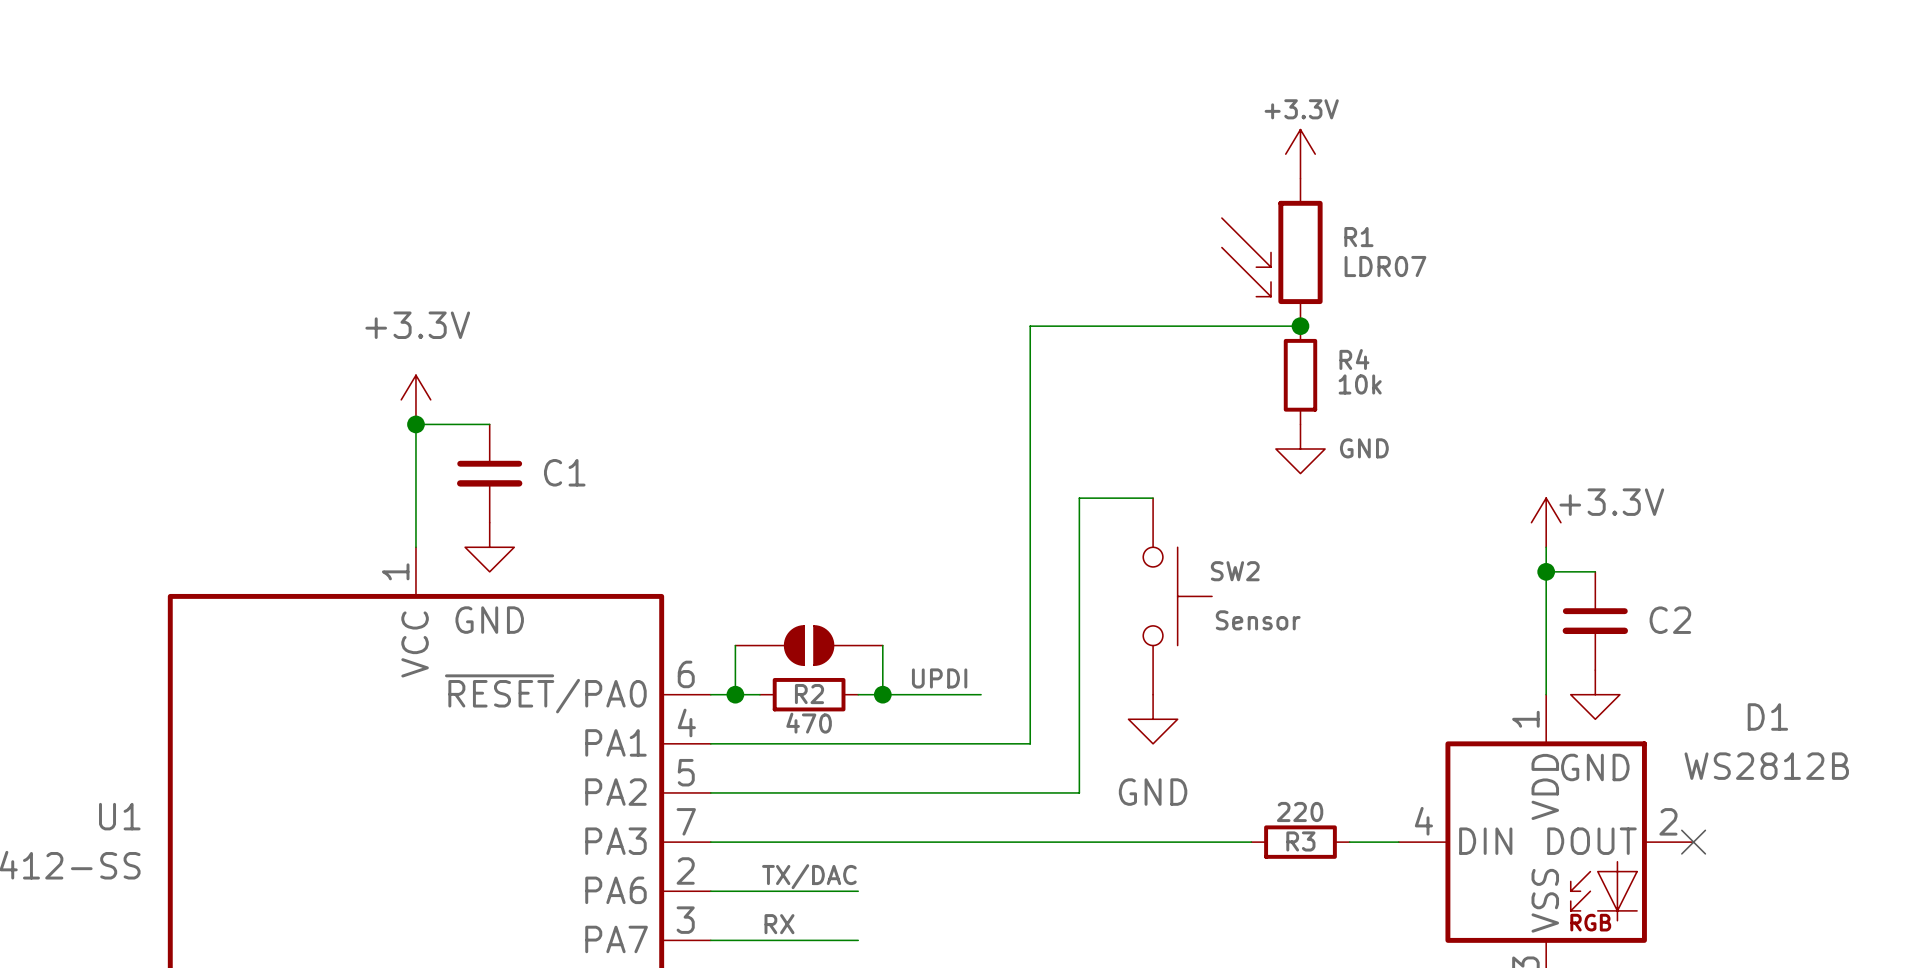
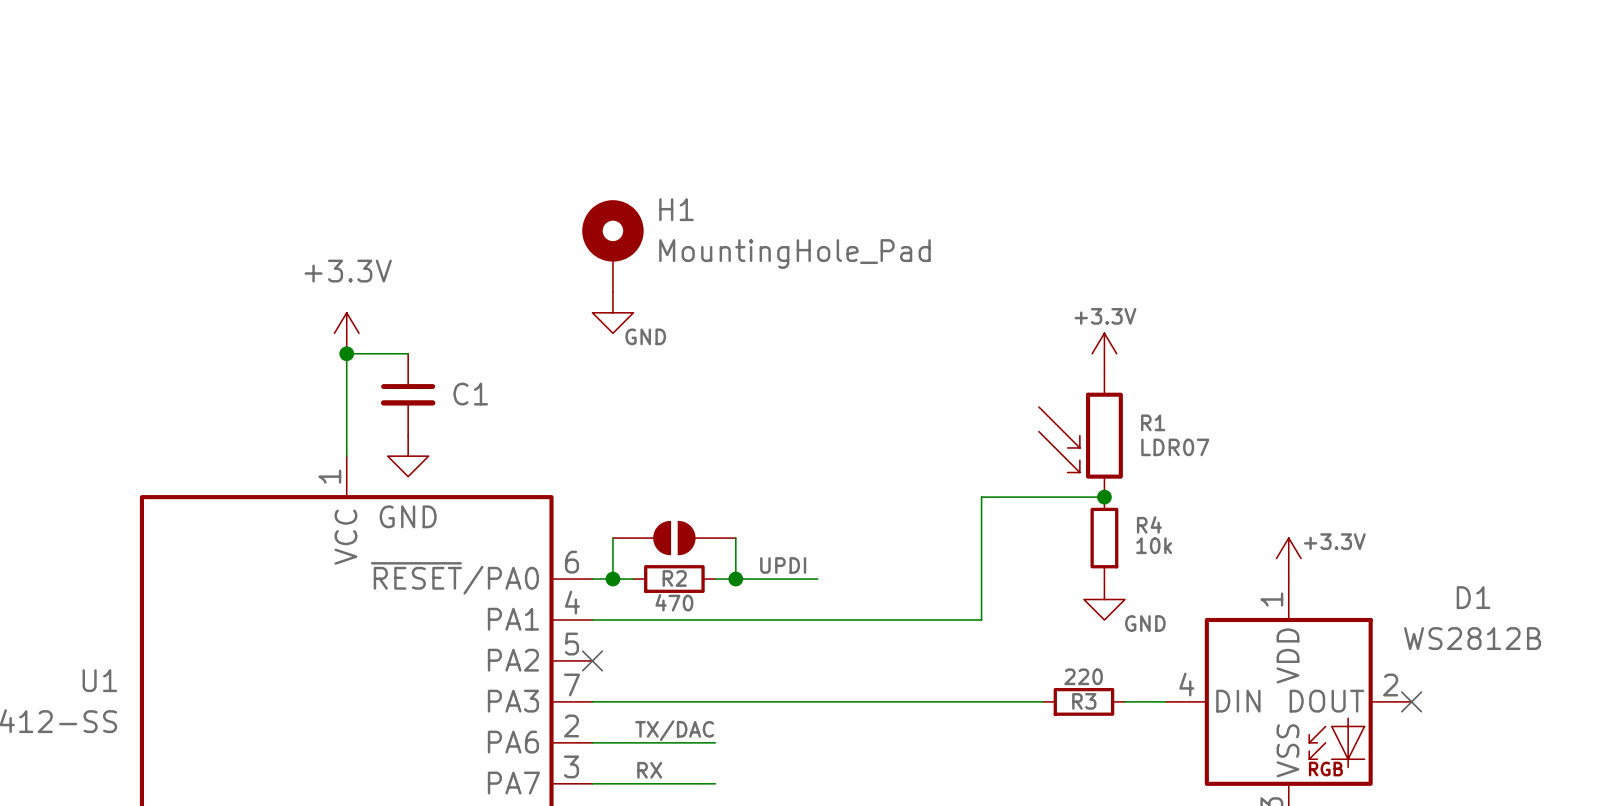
power symbol: +3.3V (1300, 154) -> none
R1 position: (1272, 252) -> (1080, 435)
H1: none -> MountingHole_Pad (612, 246)
wire: (1300, 326) (1030, 326) (1030, 743) -> (1104, 497) (981, 497) (981, 619) (858, 619)
junction: (1300, 326) -> none
power symbol: none -> GND (612, 312)
R4 position: (1300, 375) -> (1104, 538)
power symbol: none -> +3.3V (1104, 353)
power symbol: GND (1300, 449) -> none
wire: (1153, 498) (1079, 498) (1079, 792) (710, 792) -> none
power symbol: +3.3V (1546, 522) -> none
wire: (1546, 547) (1546, 694) -> none
wire: (1546, 571) (1595, 571) -> none
junction: (1546, 571) -> none
SW2: Sensor (1177, 596) -> none
junction: none -> (1104, 497)
C2: (1595, 620) -> none
power symbol: none -> +3.3V (1288, 558)
power symbol: GND (1595, 694) -> none
power symbol: GND (1153, 719) -> none
power symbol: none -> GND (1104, 599)
no-connect mark: none -> (592, 660)

